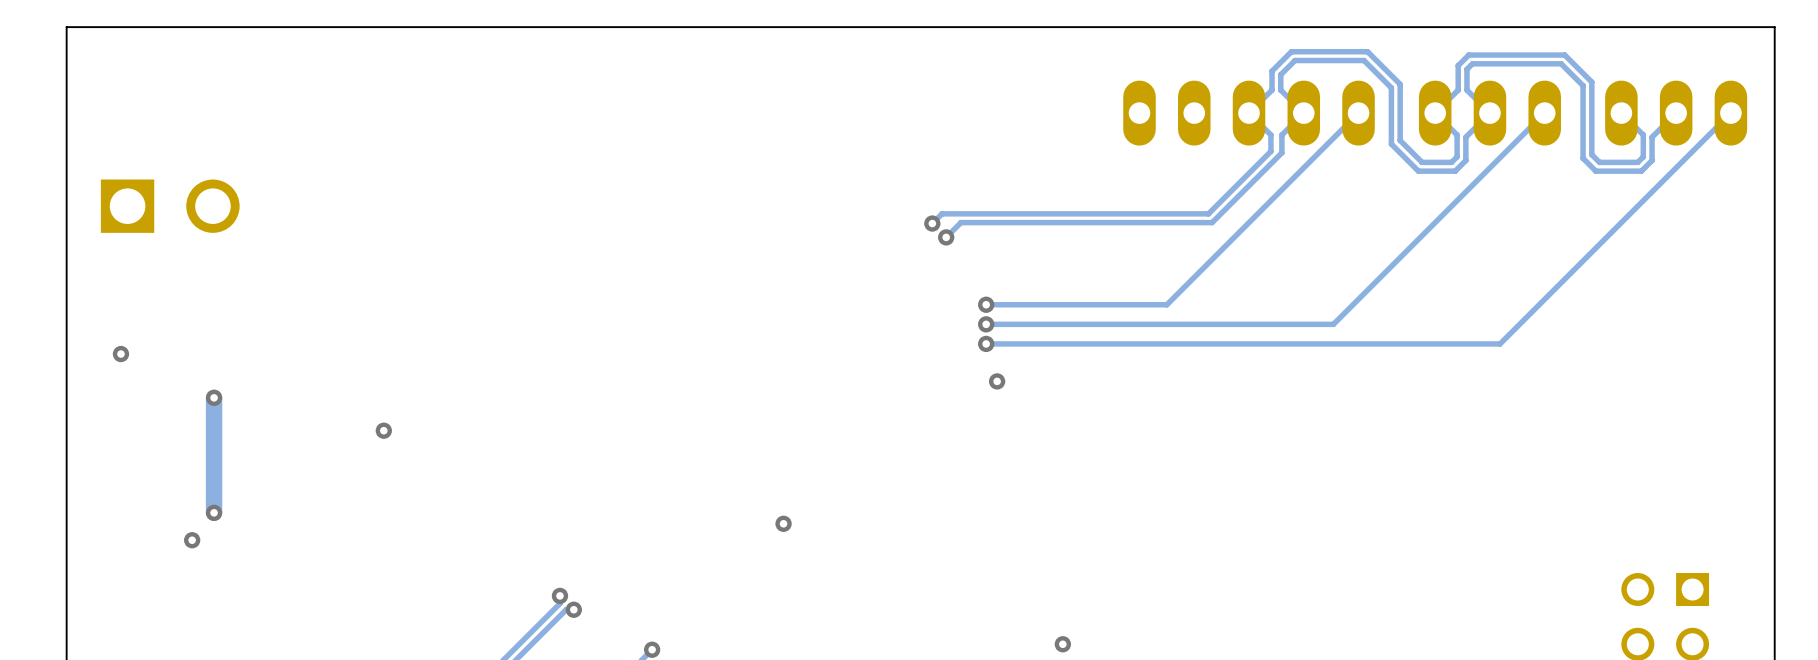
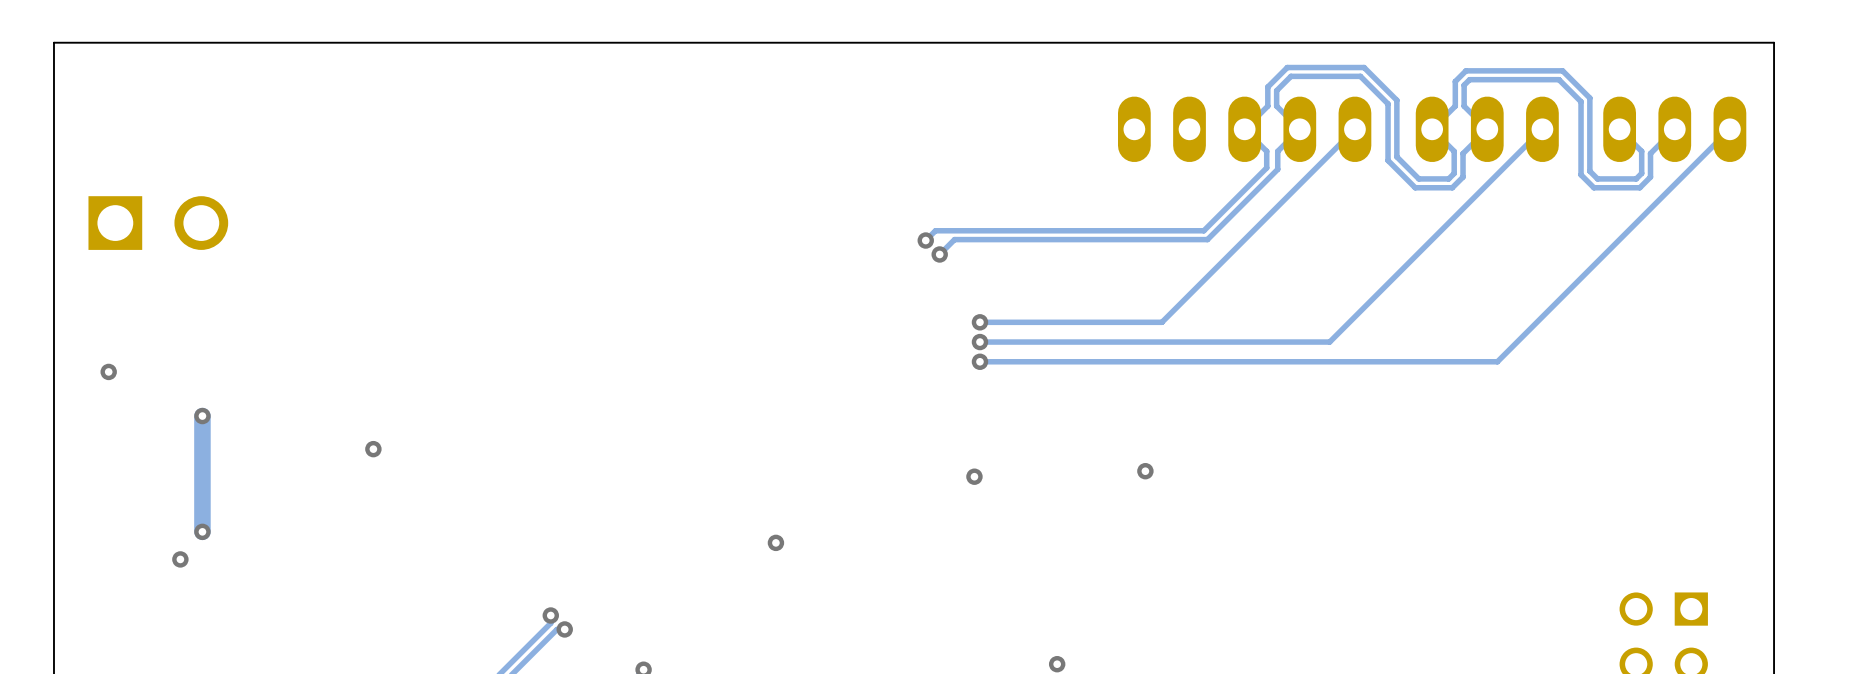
via position: (997, 381) -> (974, 476)
via: none -> (1145, 471)

